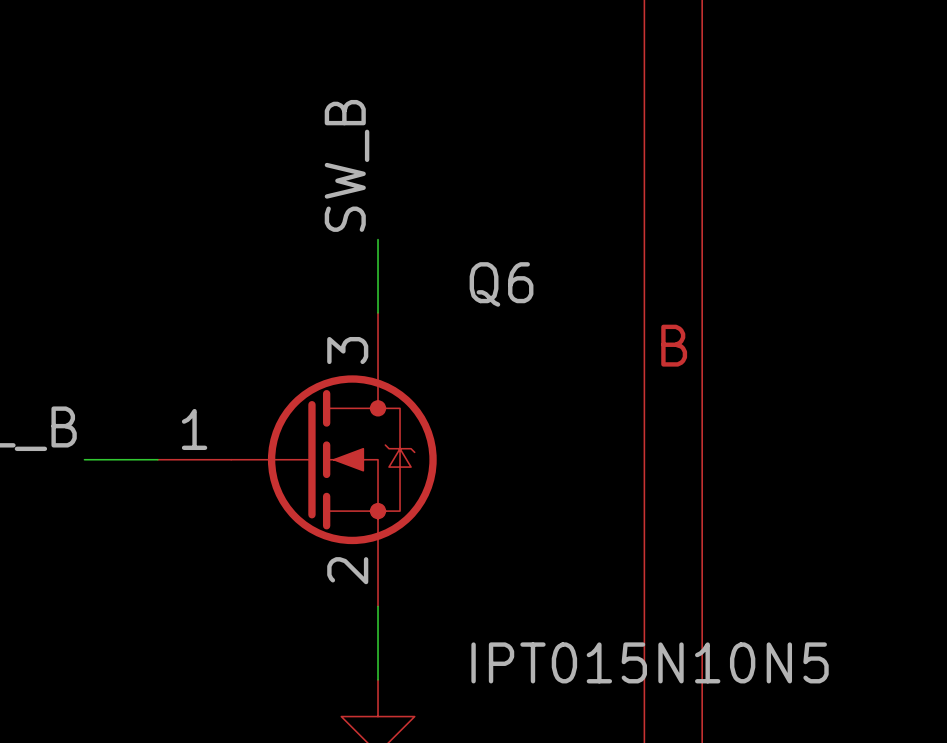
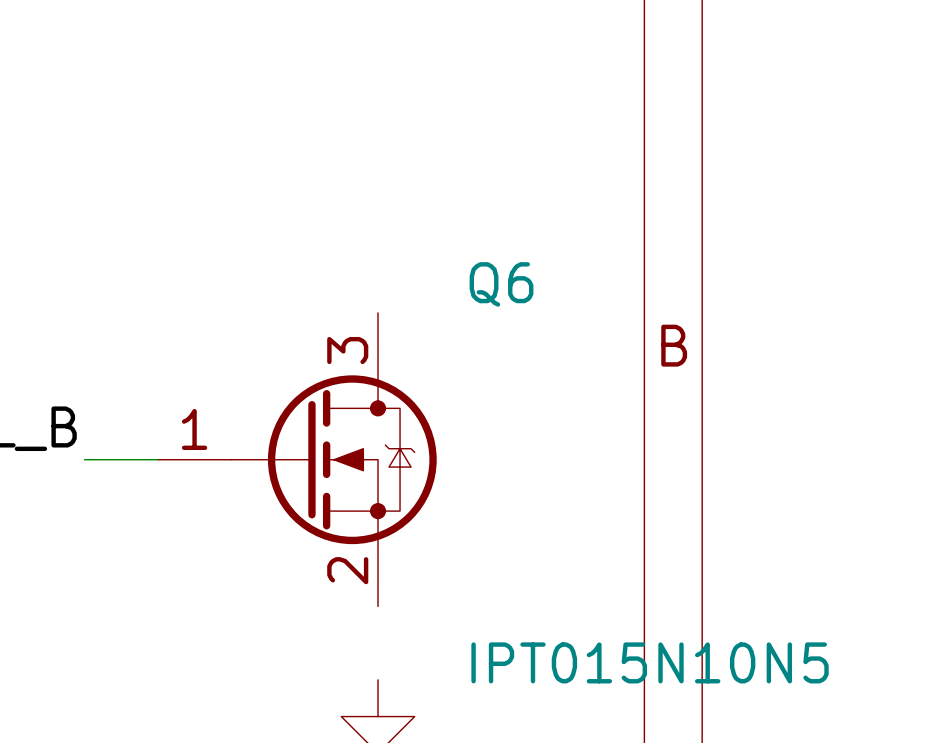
label: SW_B (347, 165) -> none
wire: (378, 239) (378, 312) -> none
wire: (378, 606) (378, 679) -> none

